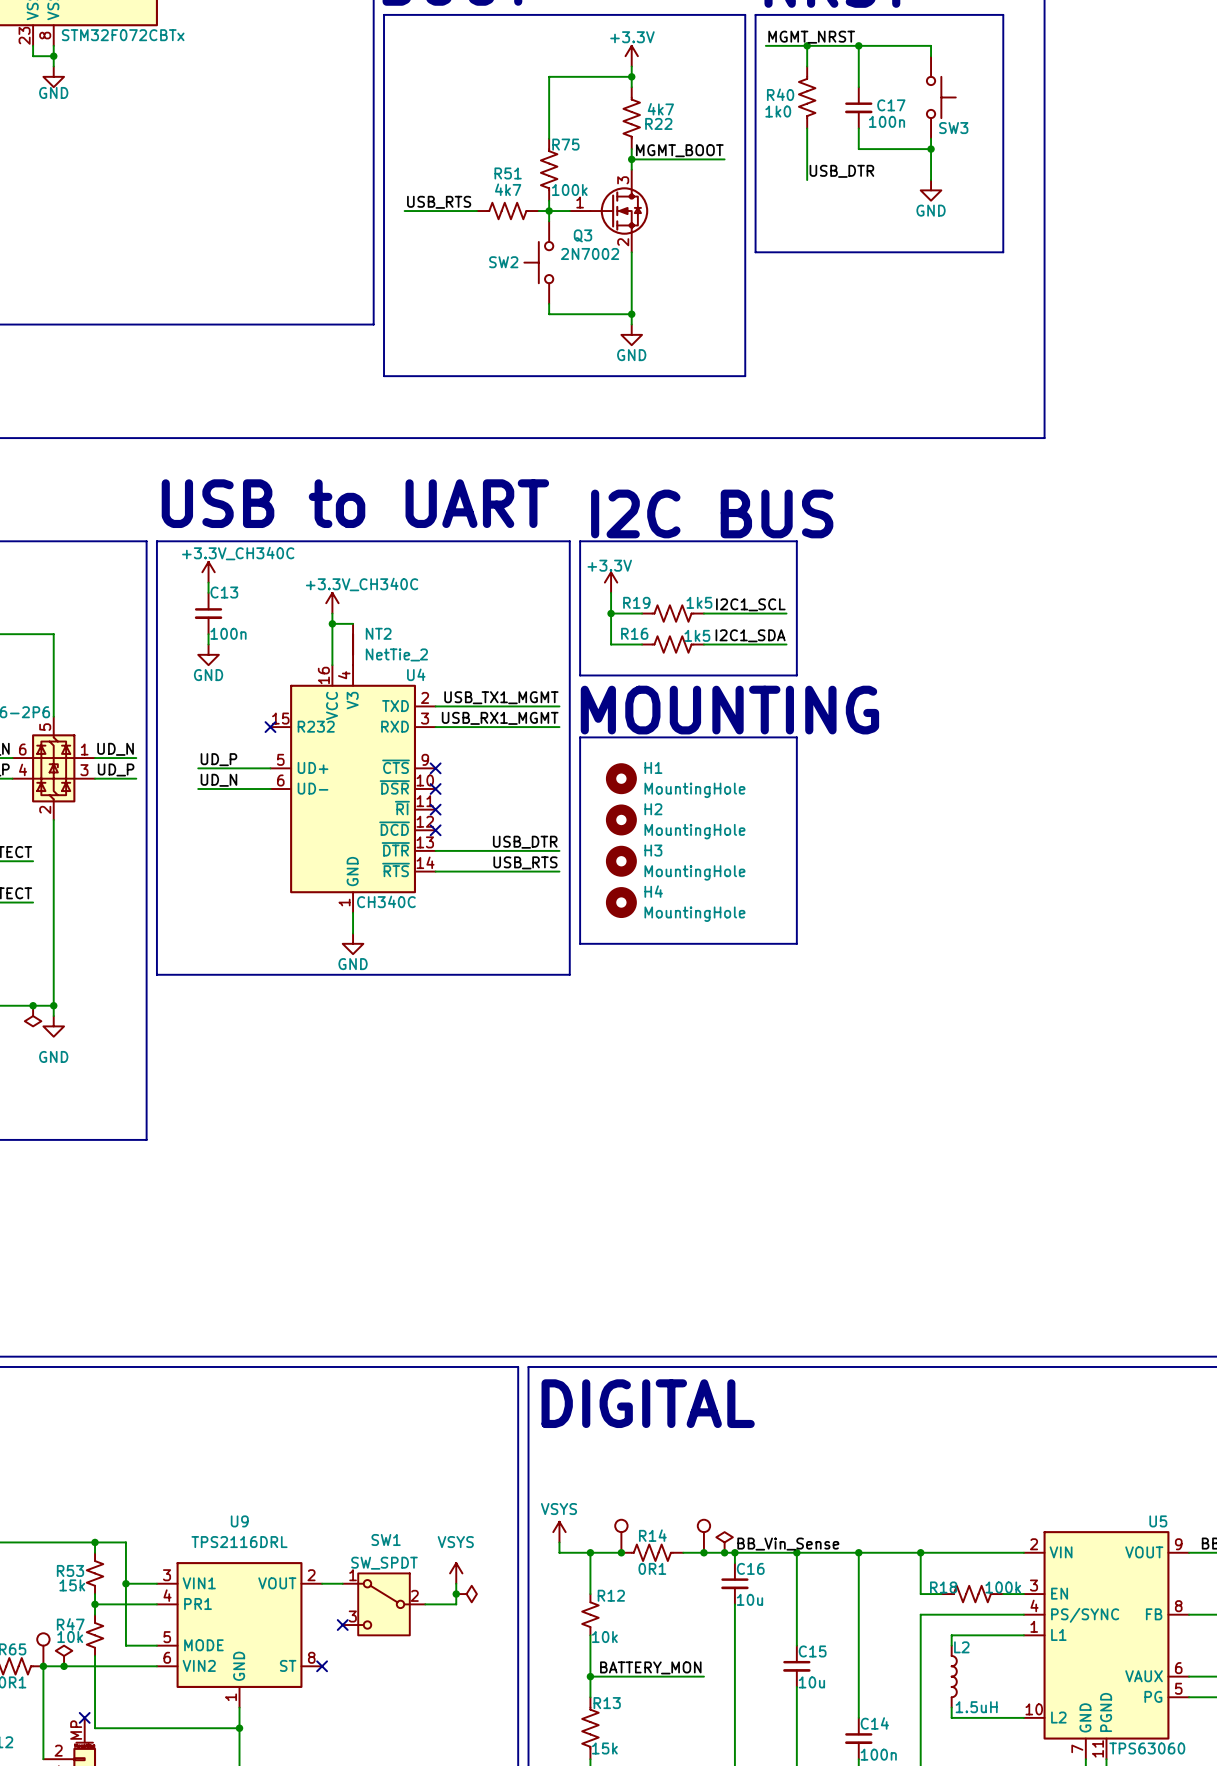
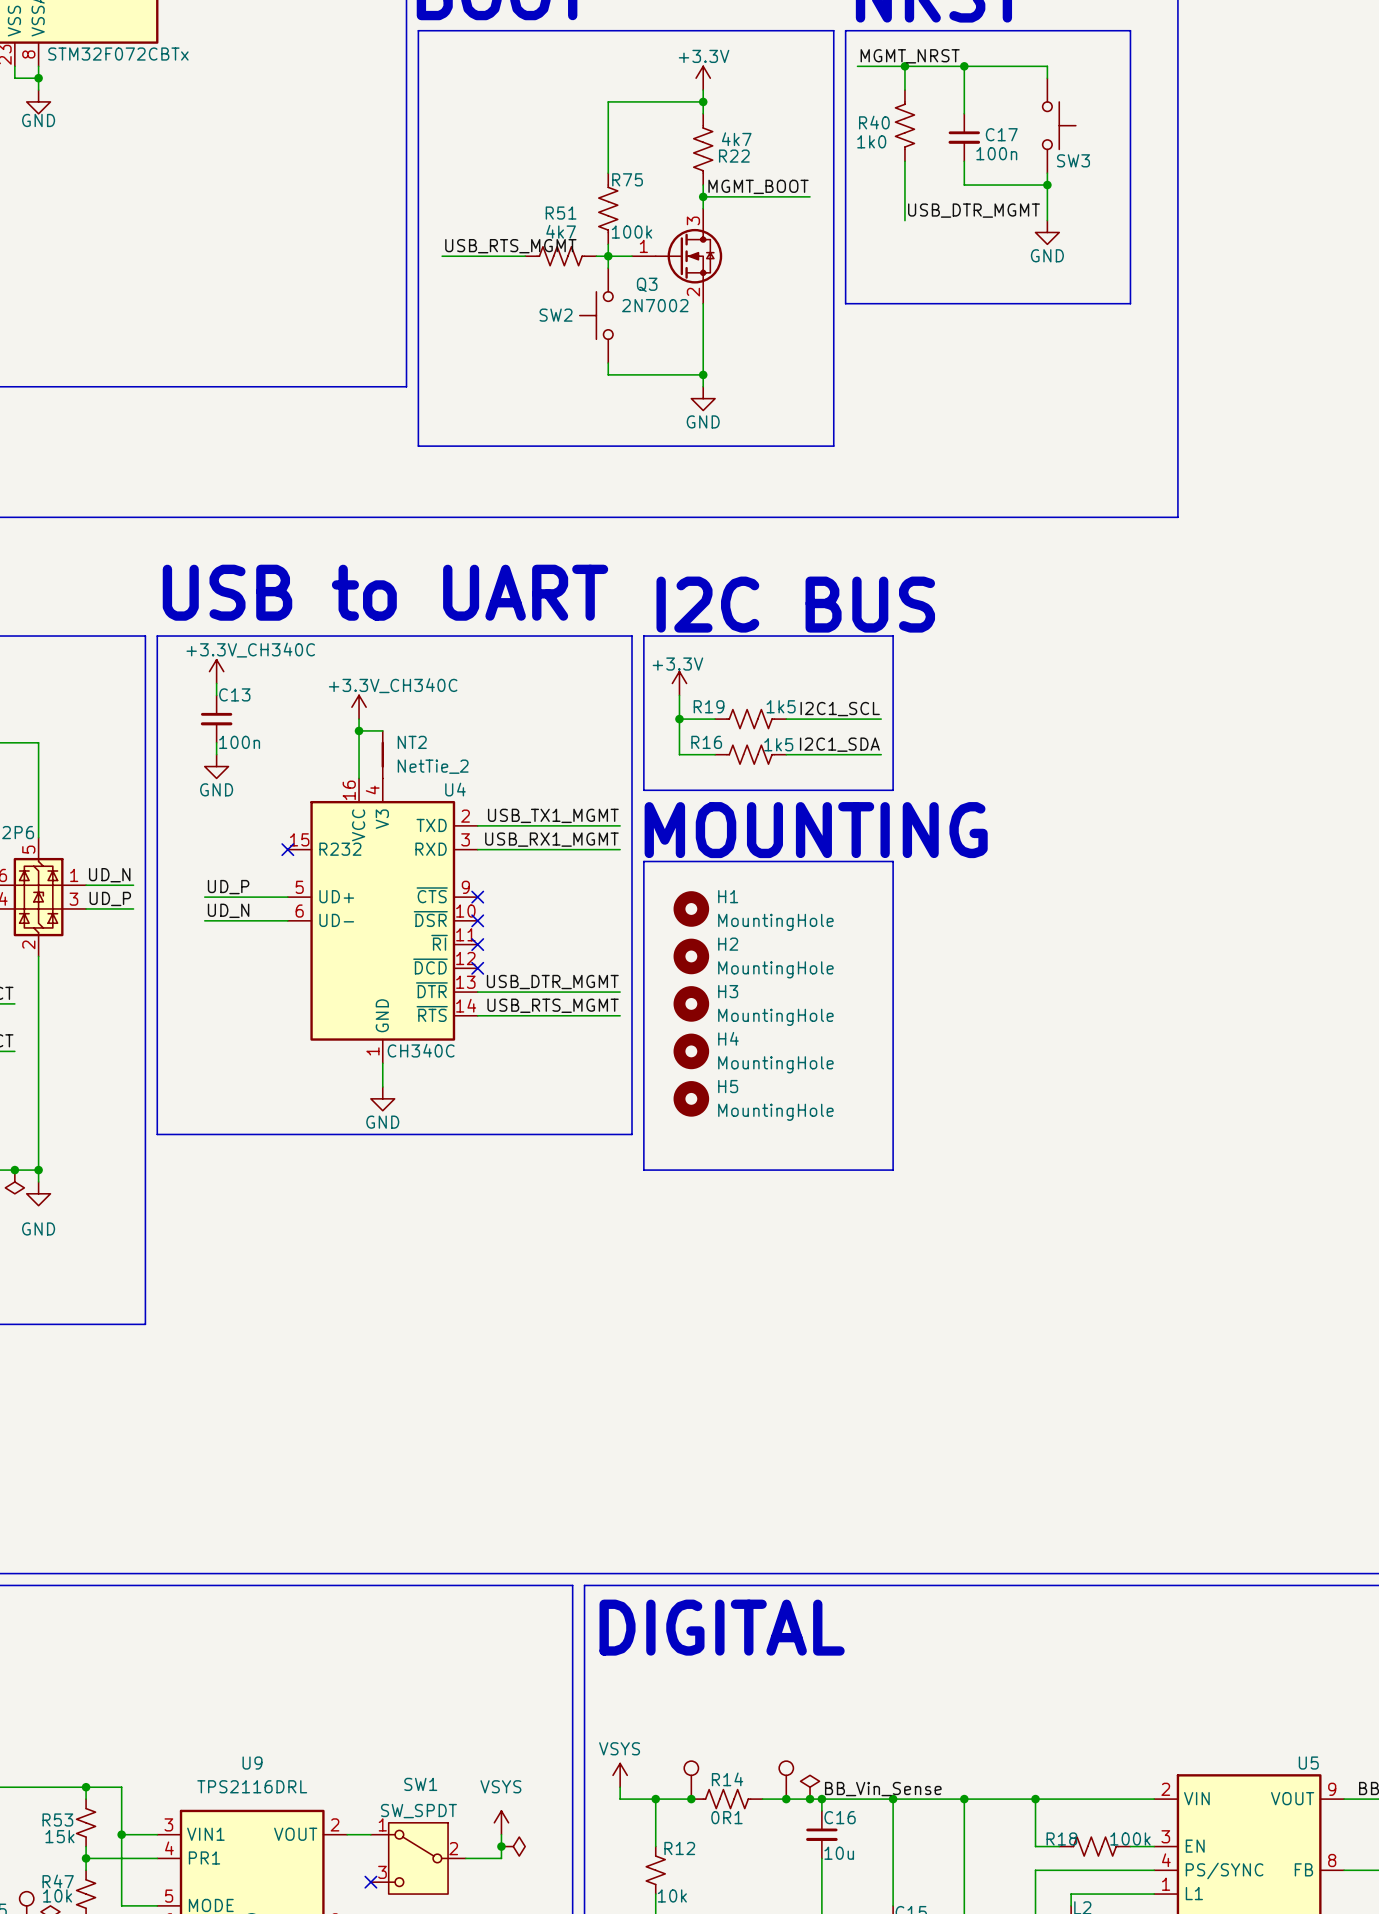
label: USB_DTR (841, 171) -> USB_DTR_MGMT (974, 210)
label: USB_RTS (439, 202) -> USB_RTS_MGMT (510, 246)
label: USB_DTR (525, 842) -> USB_DTR_MGMT (552, 982)
label: USB_RTS (525, 862) -> USB_RTS_MGMT (553, 1005)
line: (580, 943) (796, 943) -> (643, 1098) (643, 1170) (893, 1170) (893, 1098)
H5: none -> MountingHole (691, 1098)

